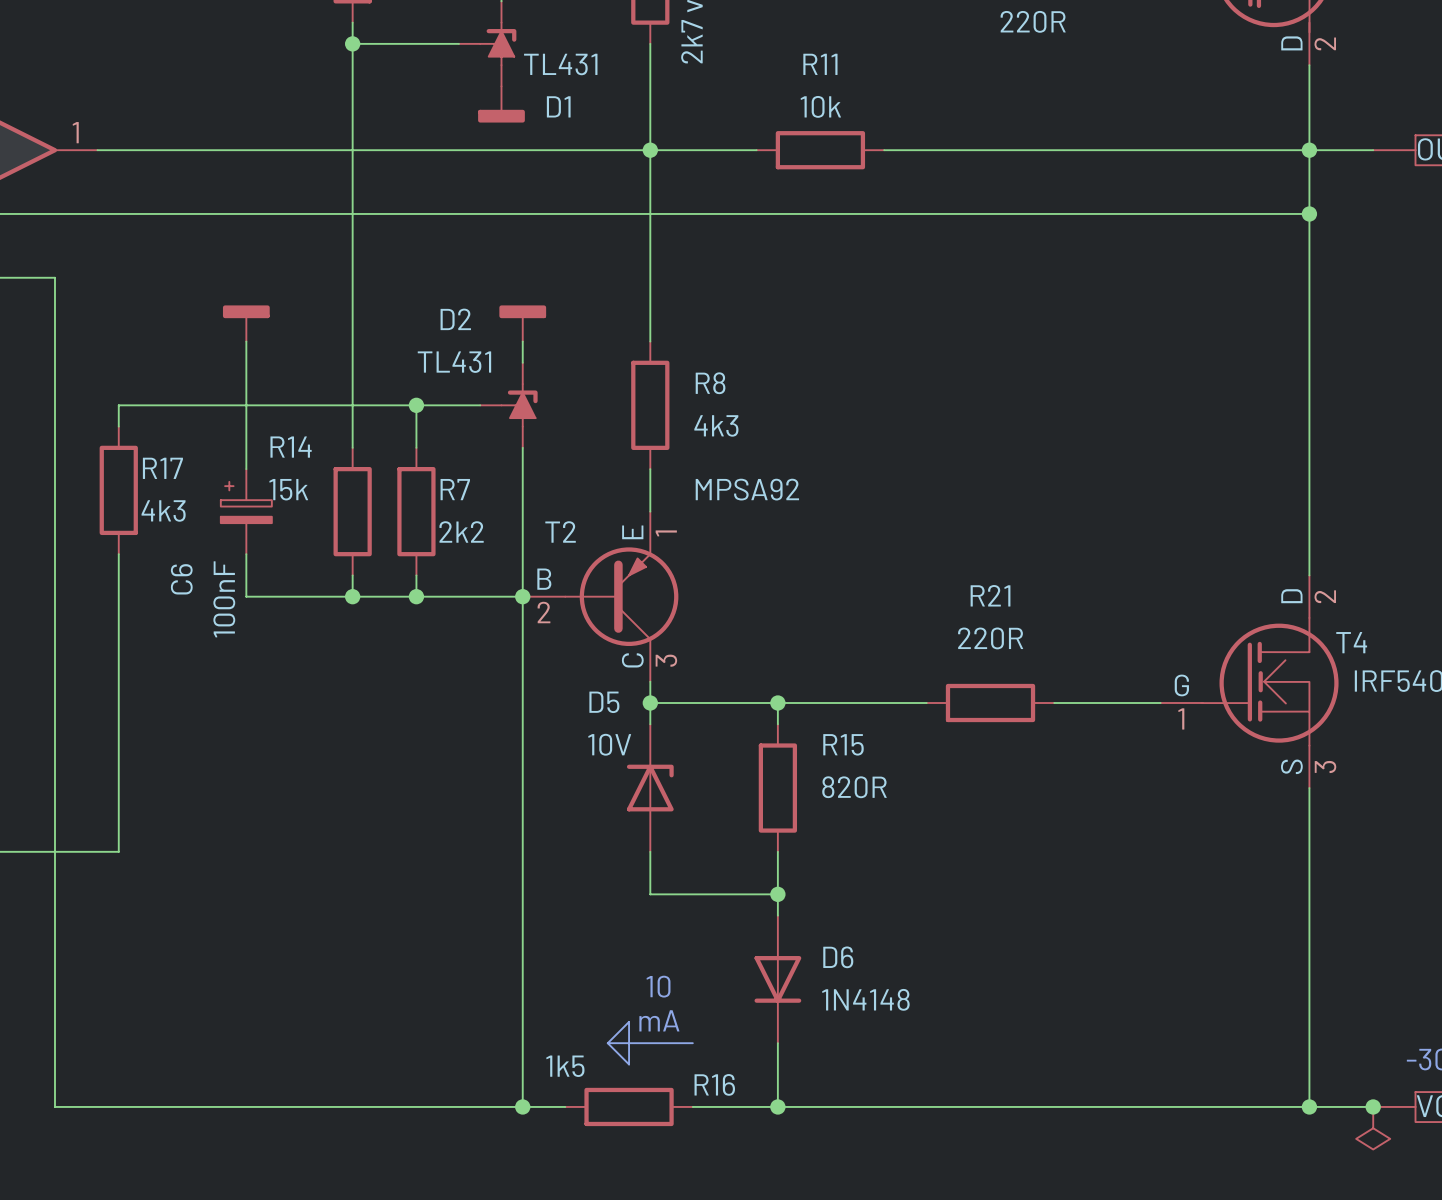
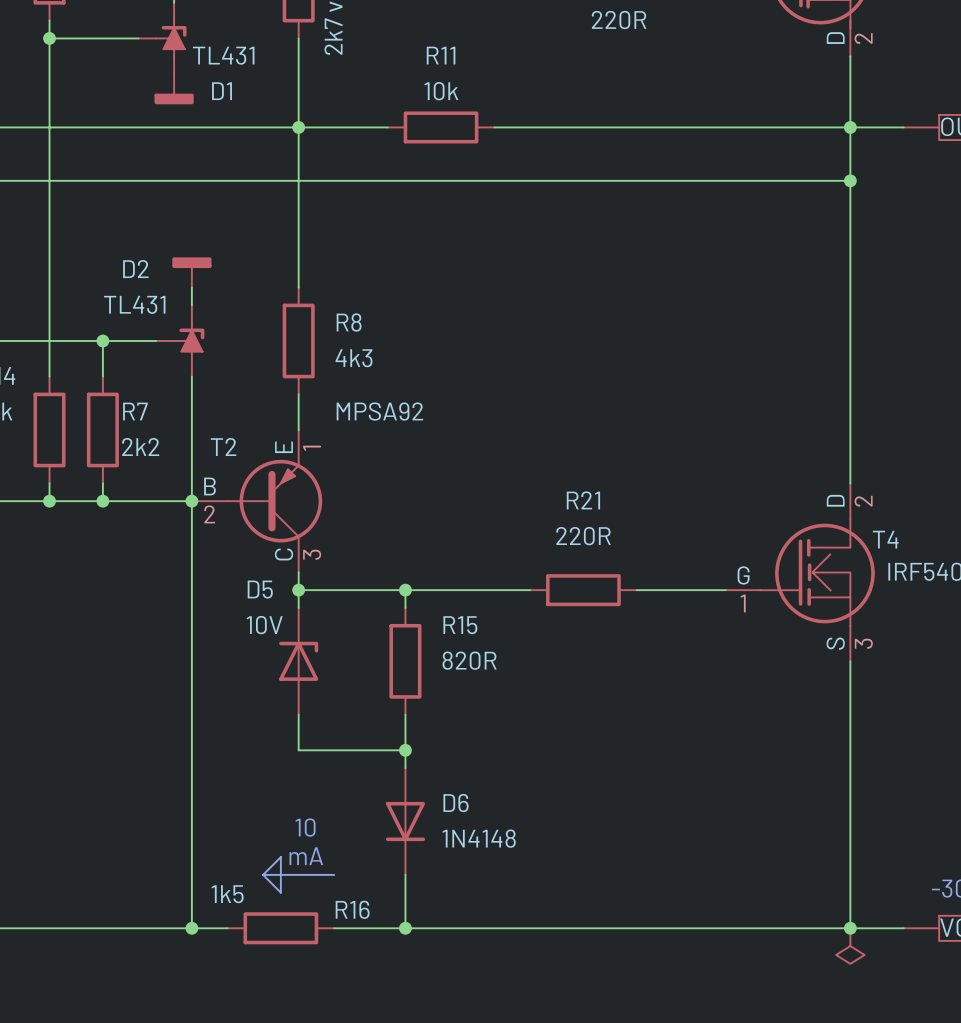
junction: (1373, 1106) -> none
power symbol position: (1373, 1128) -> (850, 946)

